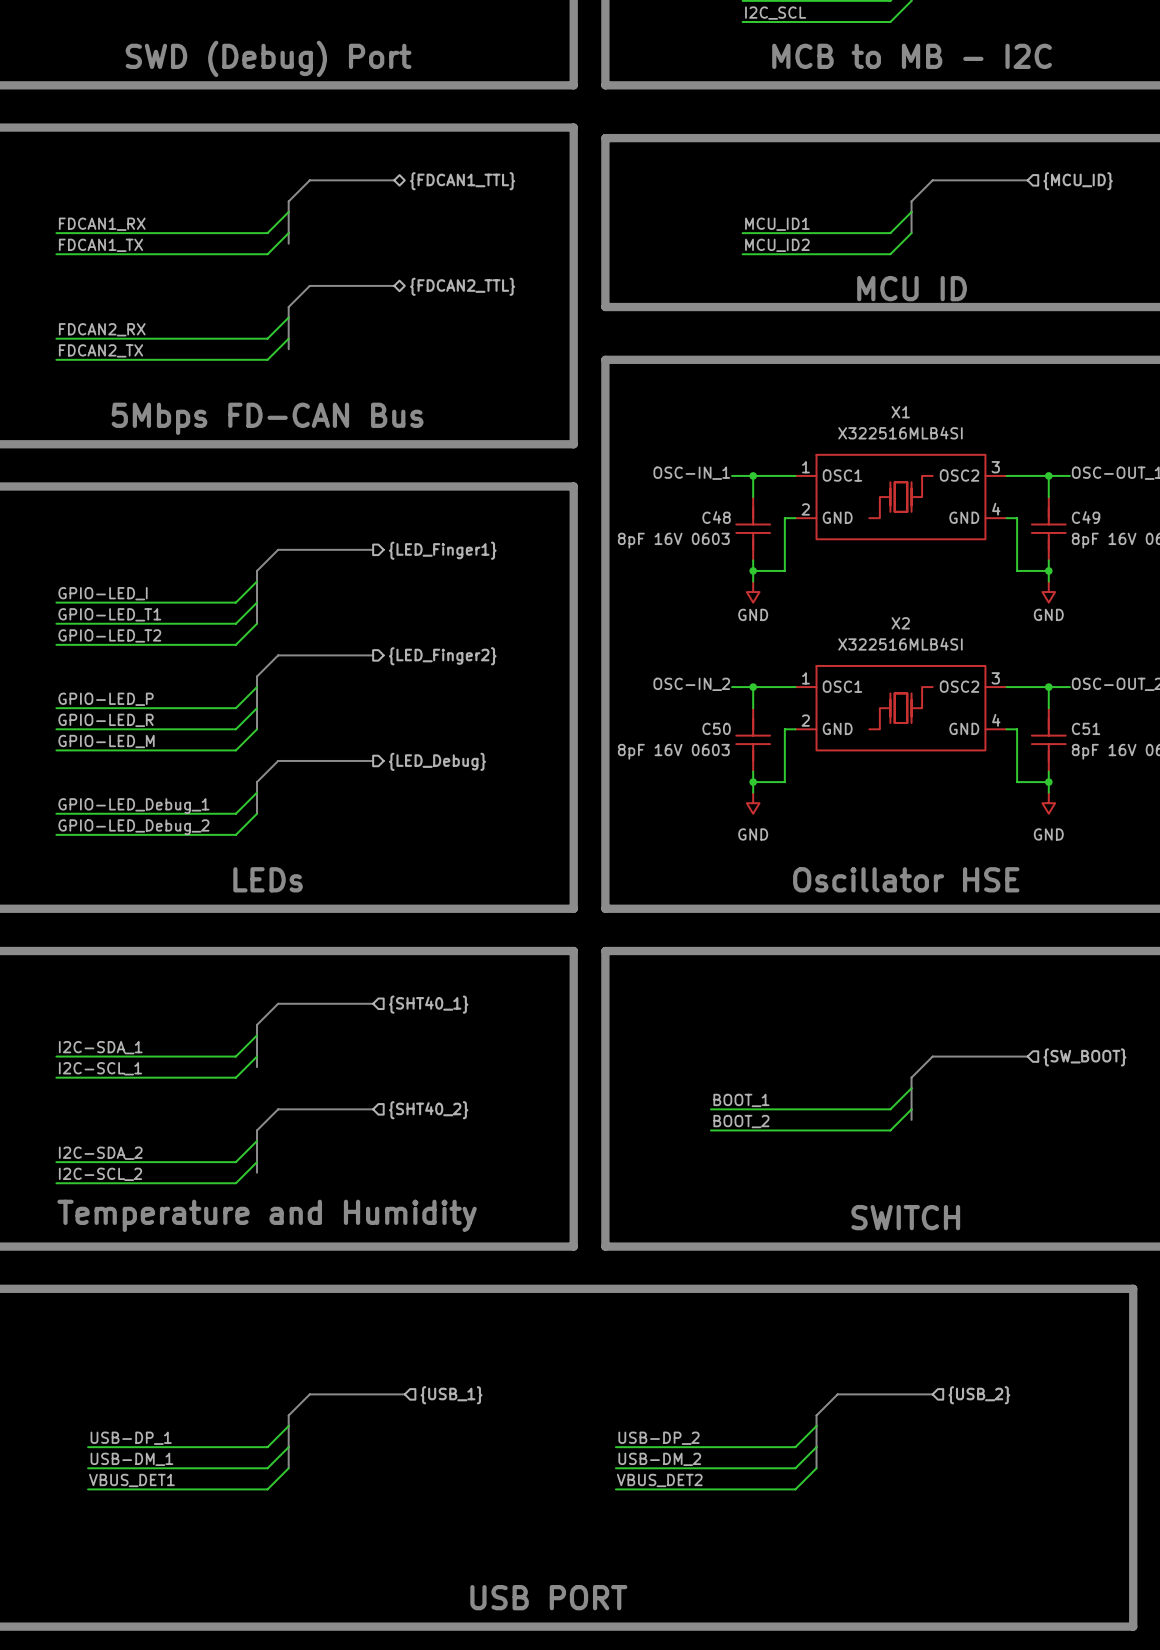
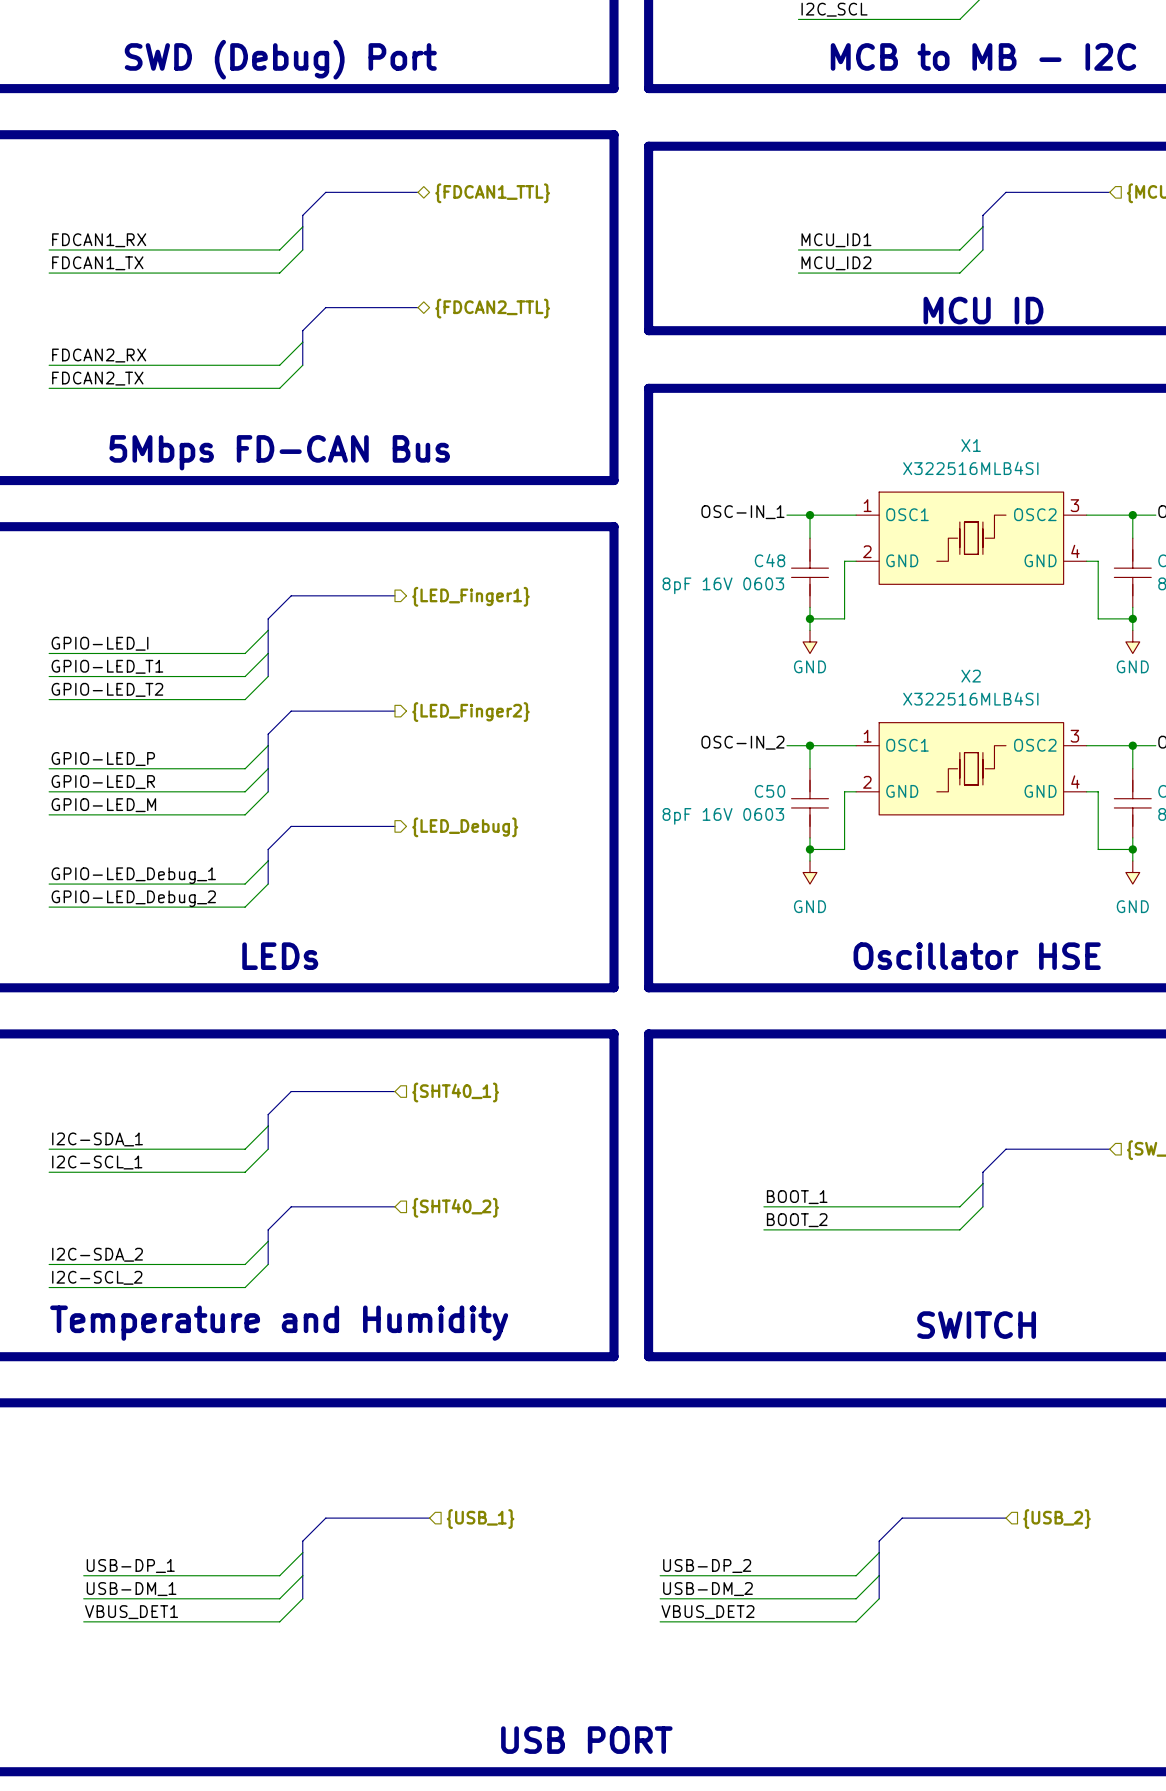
bus: (288, 233) (288, 243) -> none
bus: (288, 338) (288, 349) -> none
bus: (257, 1056) (257, 1067) -> none
bus: (911, 1109) (911, 1119) -> none
bus: (257, 1162) (257, 1172) -> none

